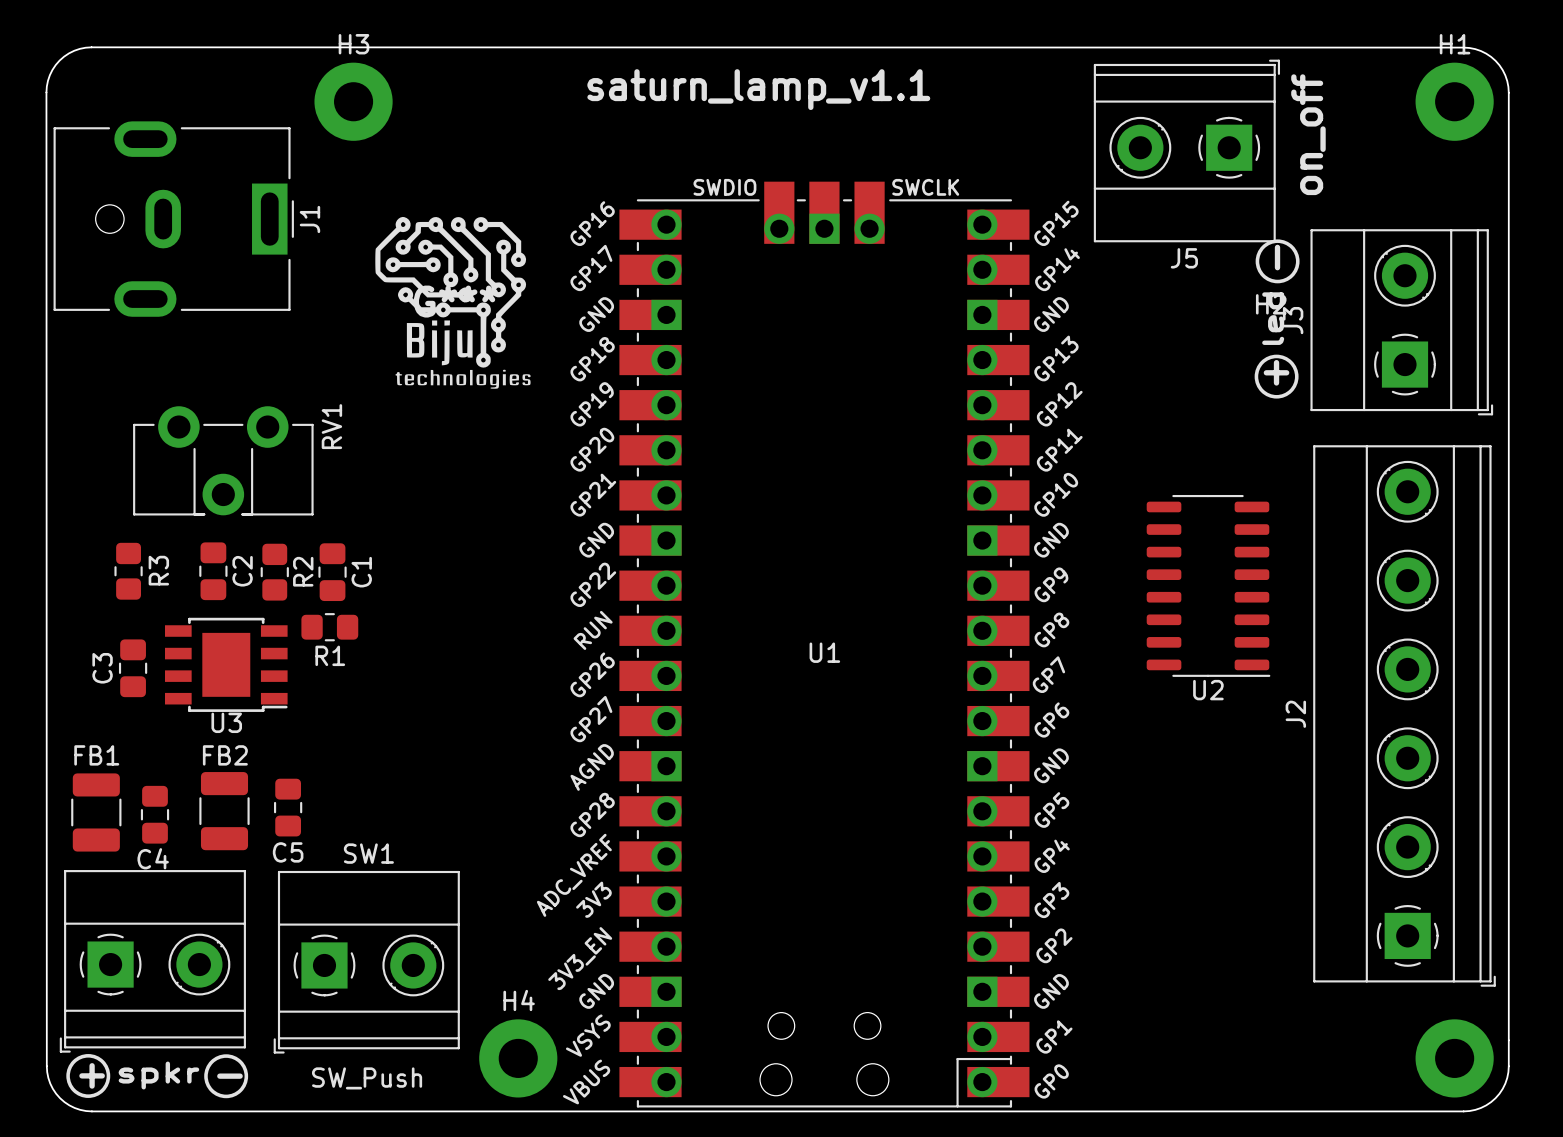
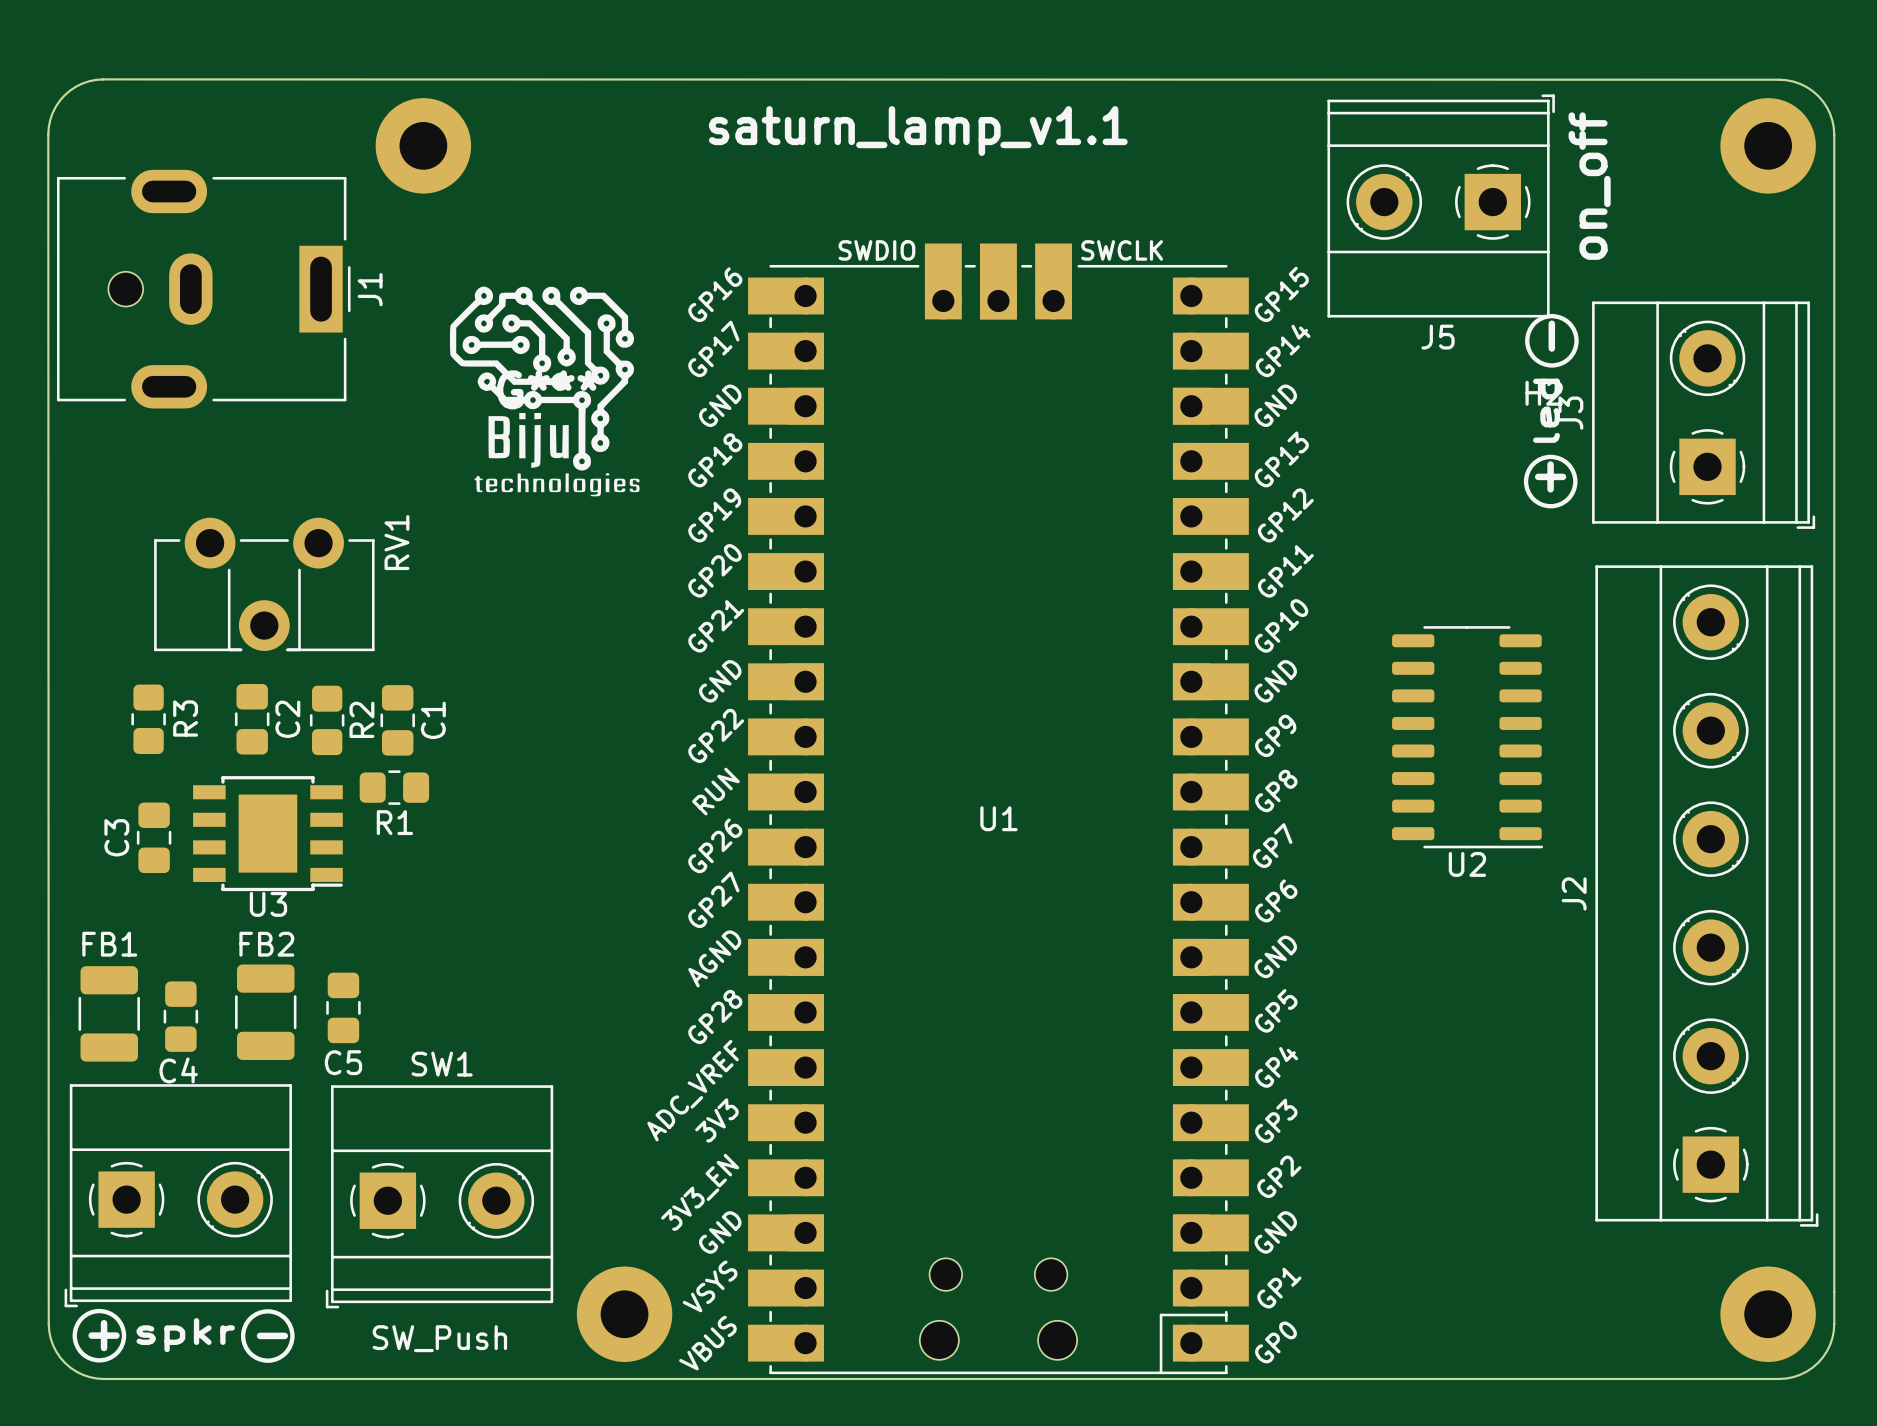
H3 name: H3 (353, 44) -> none
H1 name: H1 (1455, 44) -> none
H4 name: H4 (519, 1000) -> none

